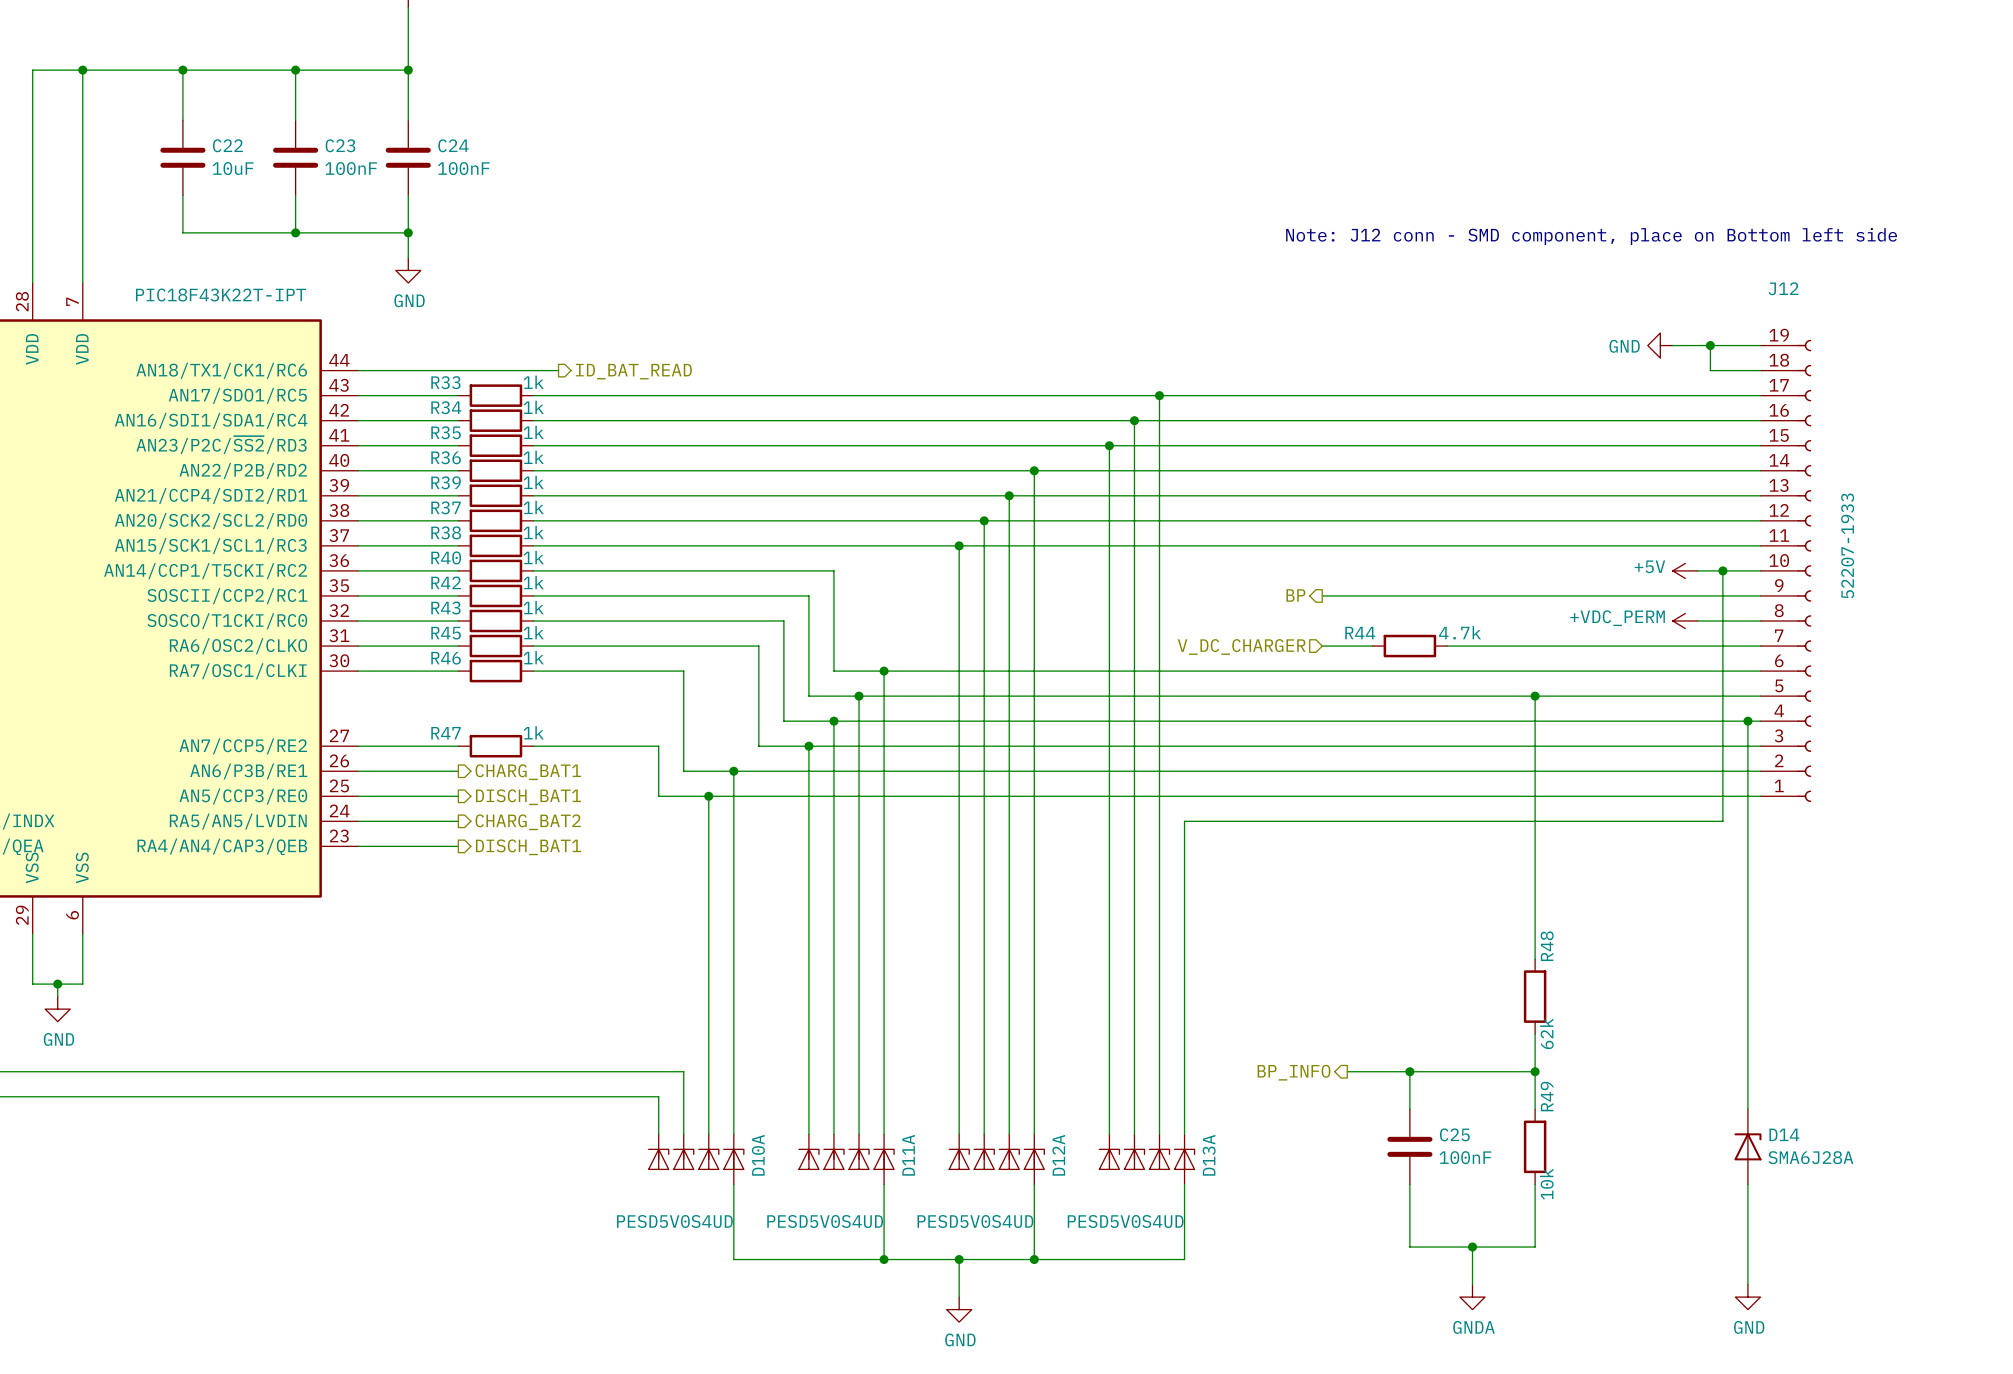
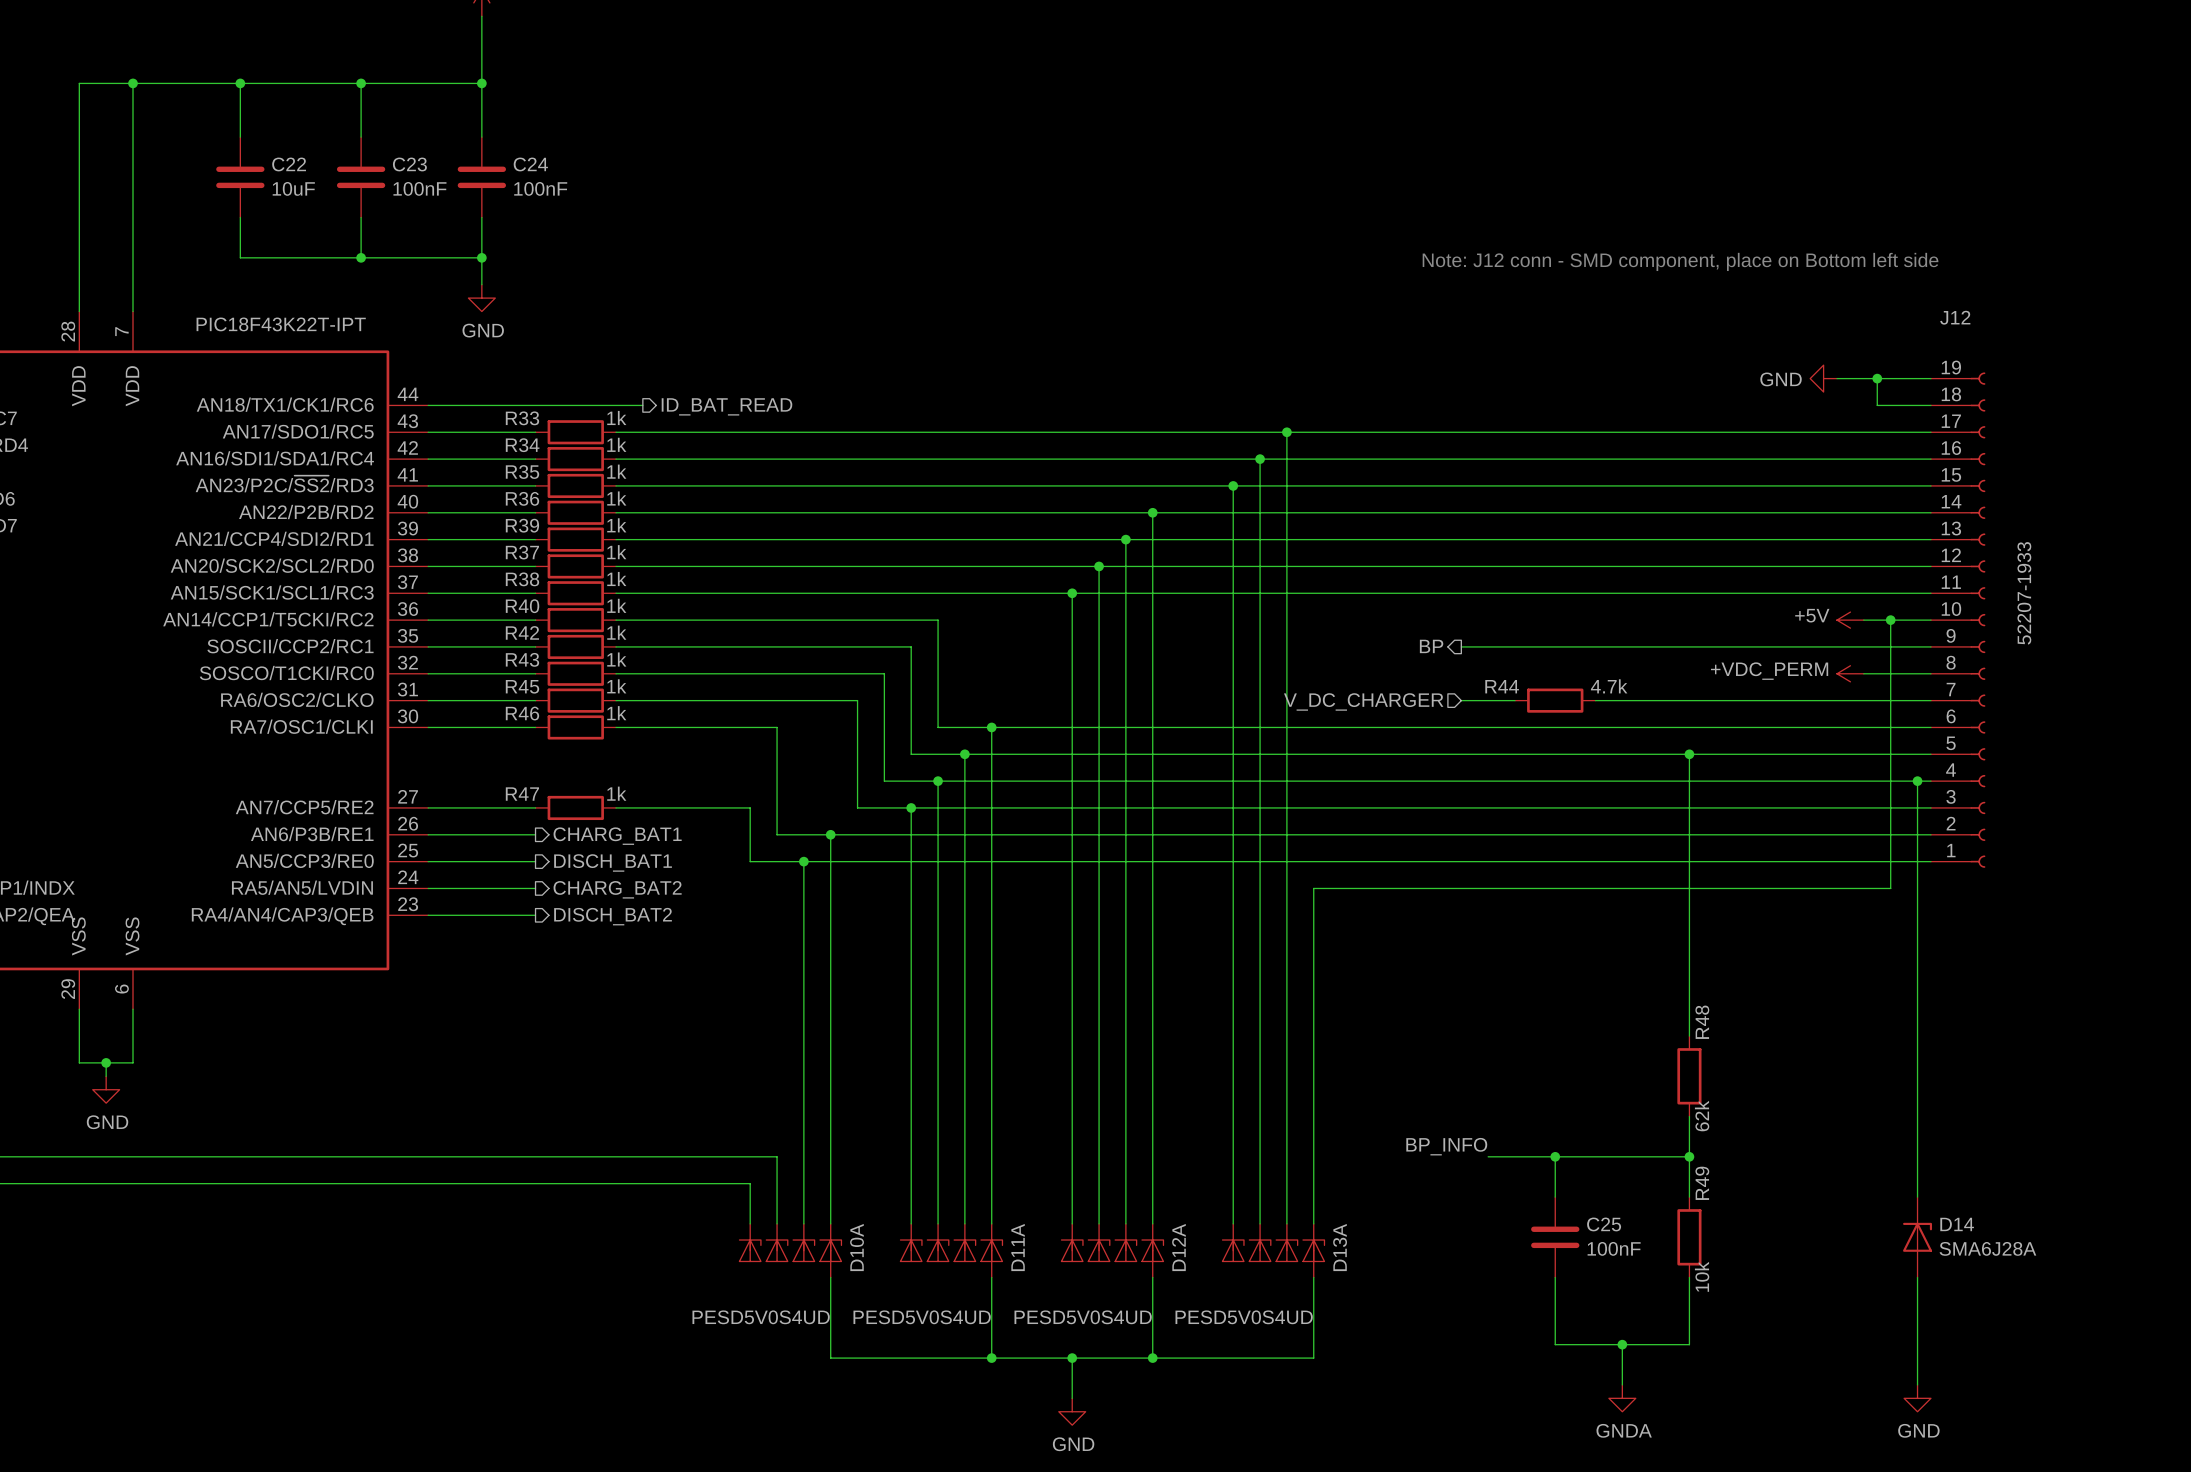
hierarchical label: DISCH_BAT1 (528, 847) -> DISCH_BAT2 (613, 916)
label: none -> BP_INFO (1446, 1146)
hierarchical label: BP_INFO (1294, 1072) -> none

